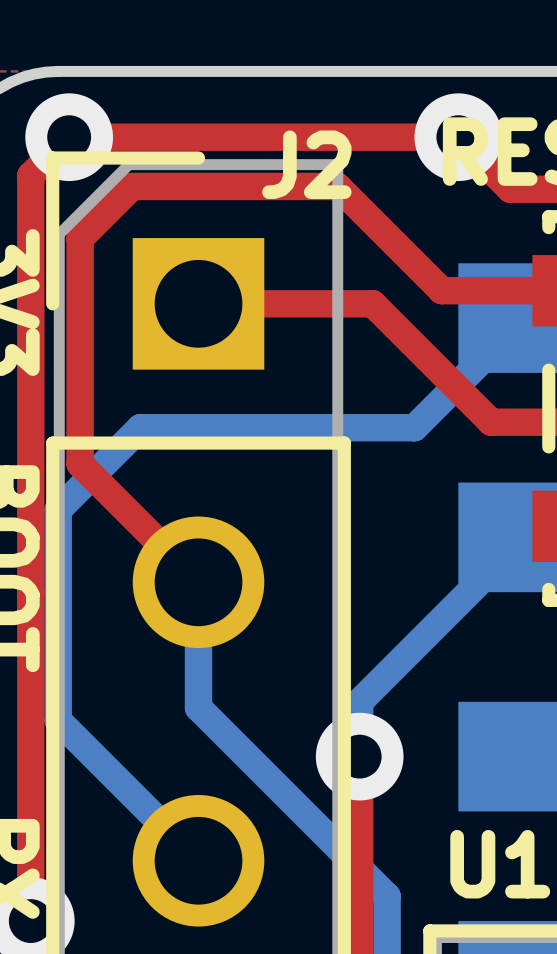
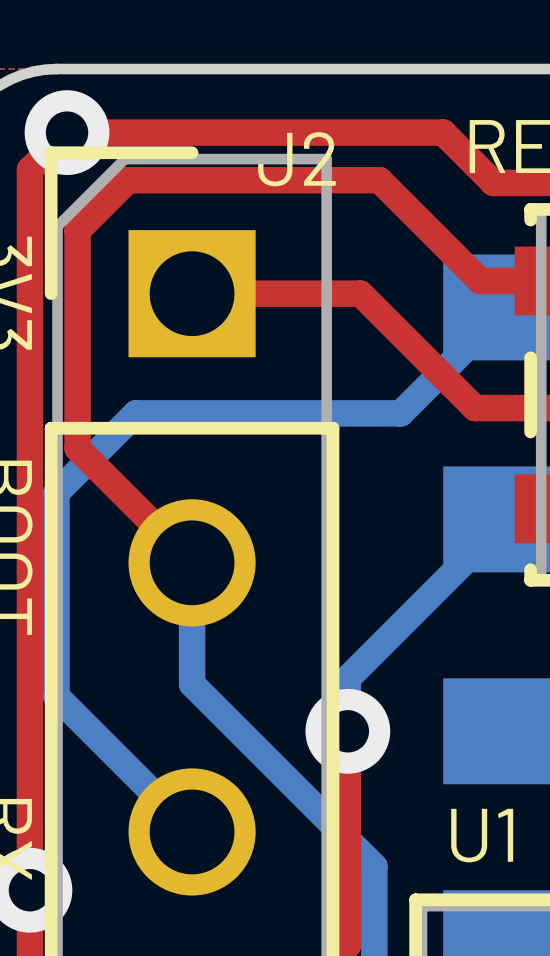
via: (458, 137) -> none
top track: (337, 186) (441, 290) (496, 290) -> (326, 180) (379, 180) (480, 280)

